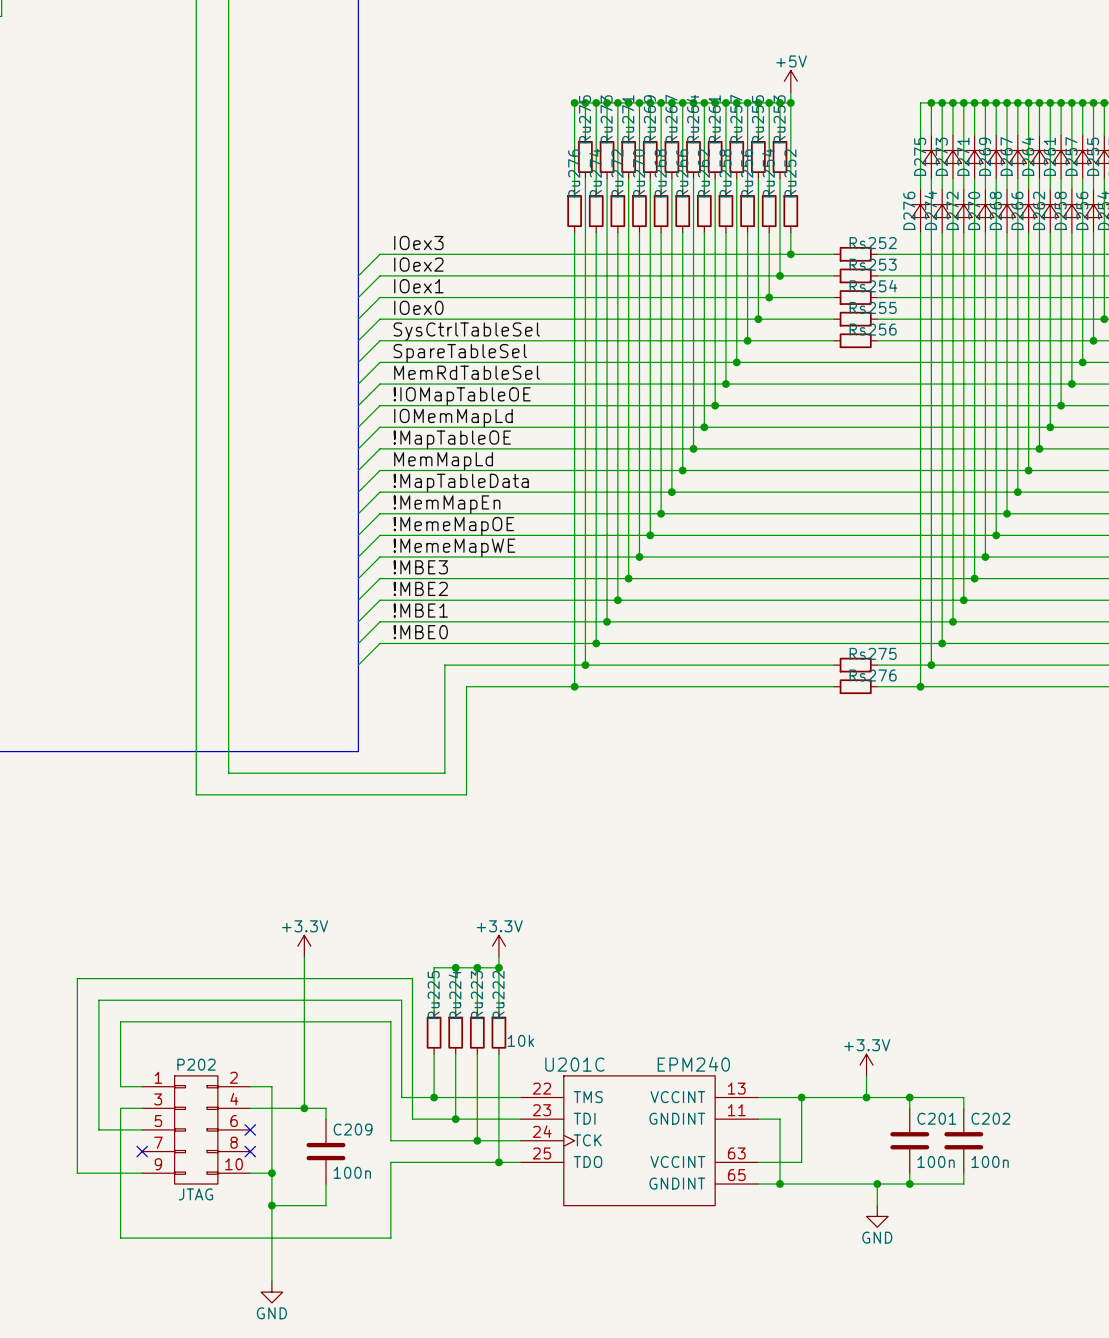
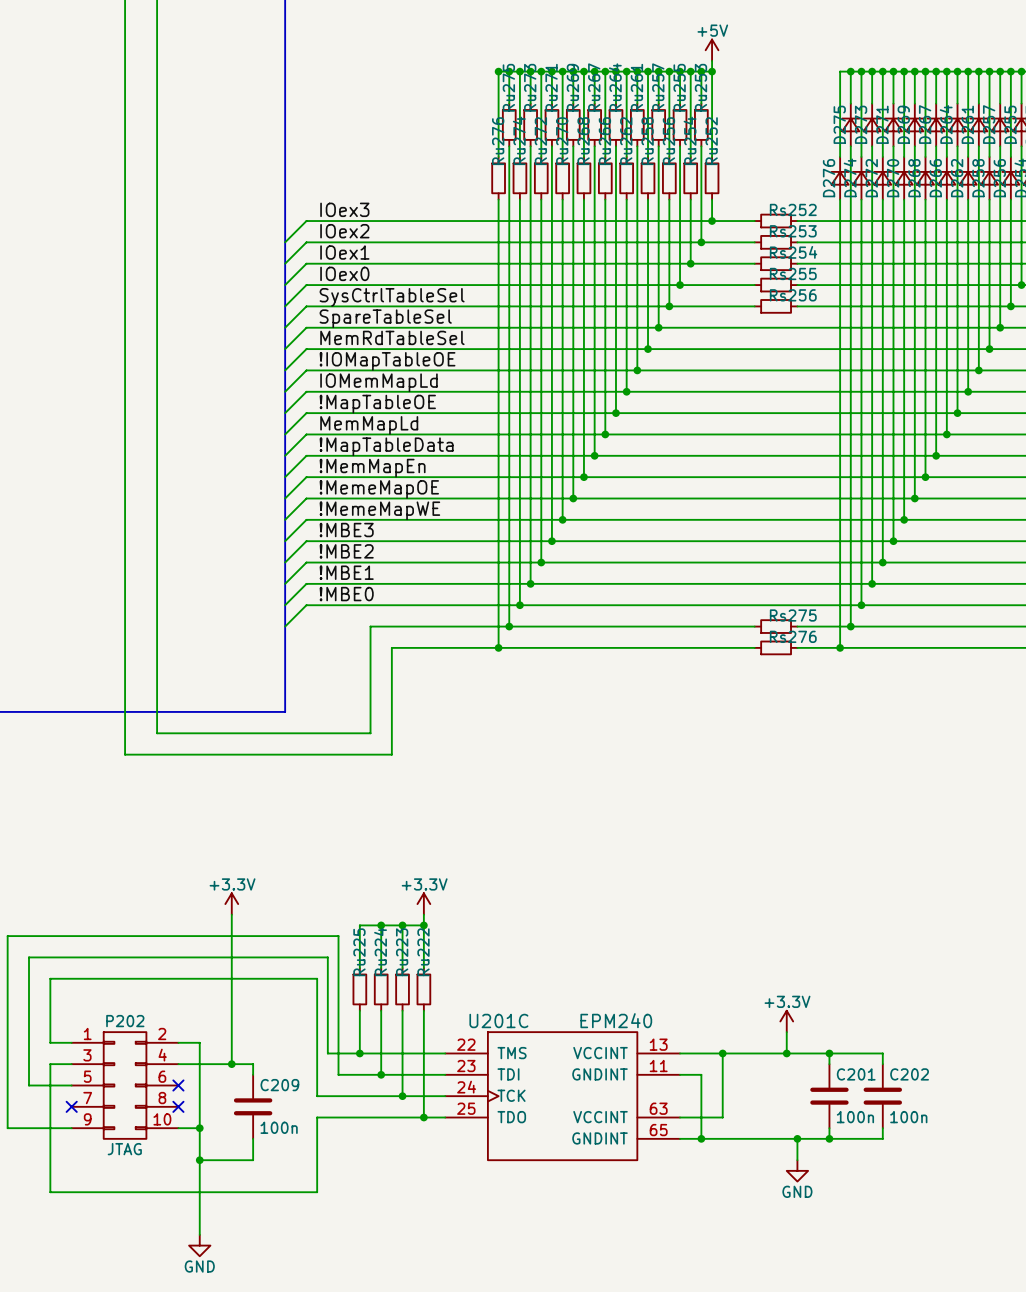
Ru222 value: 10k (520, 1040) -> none

